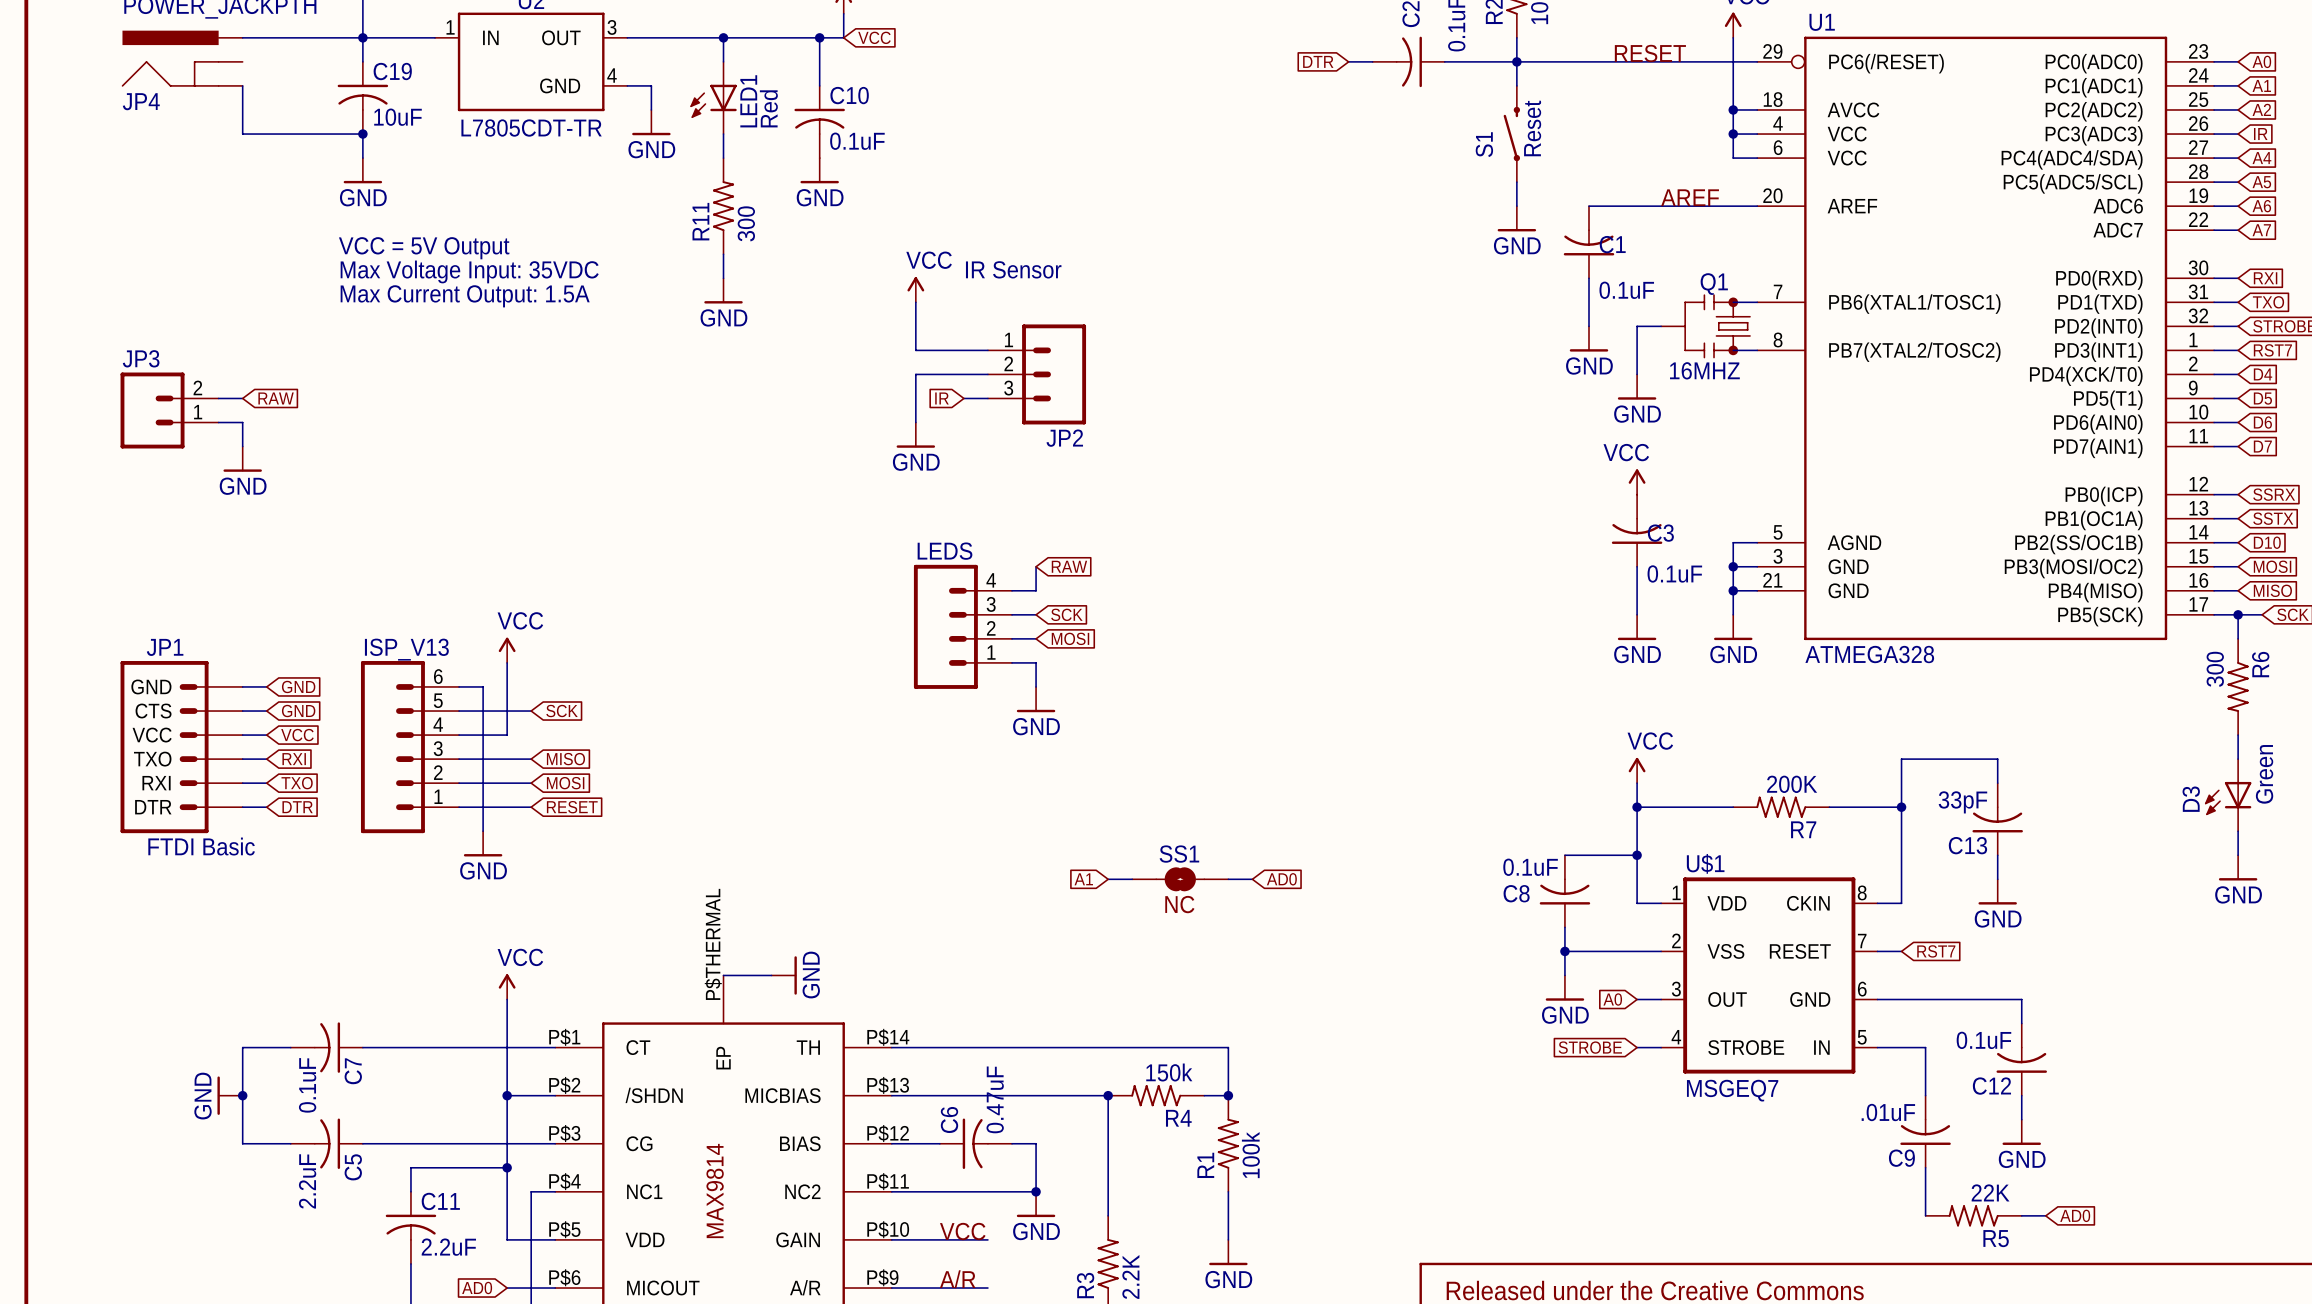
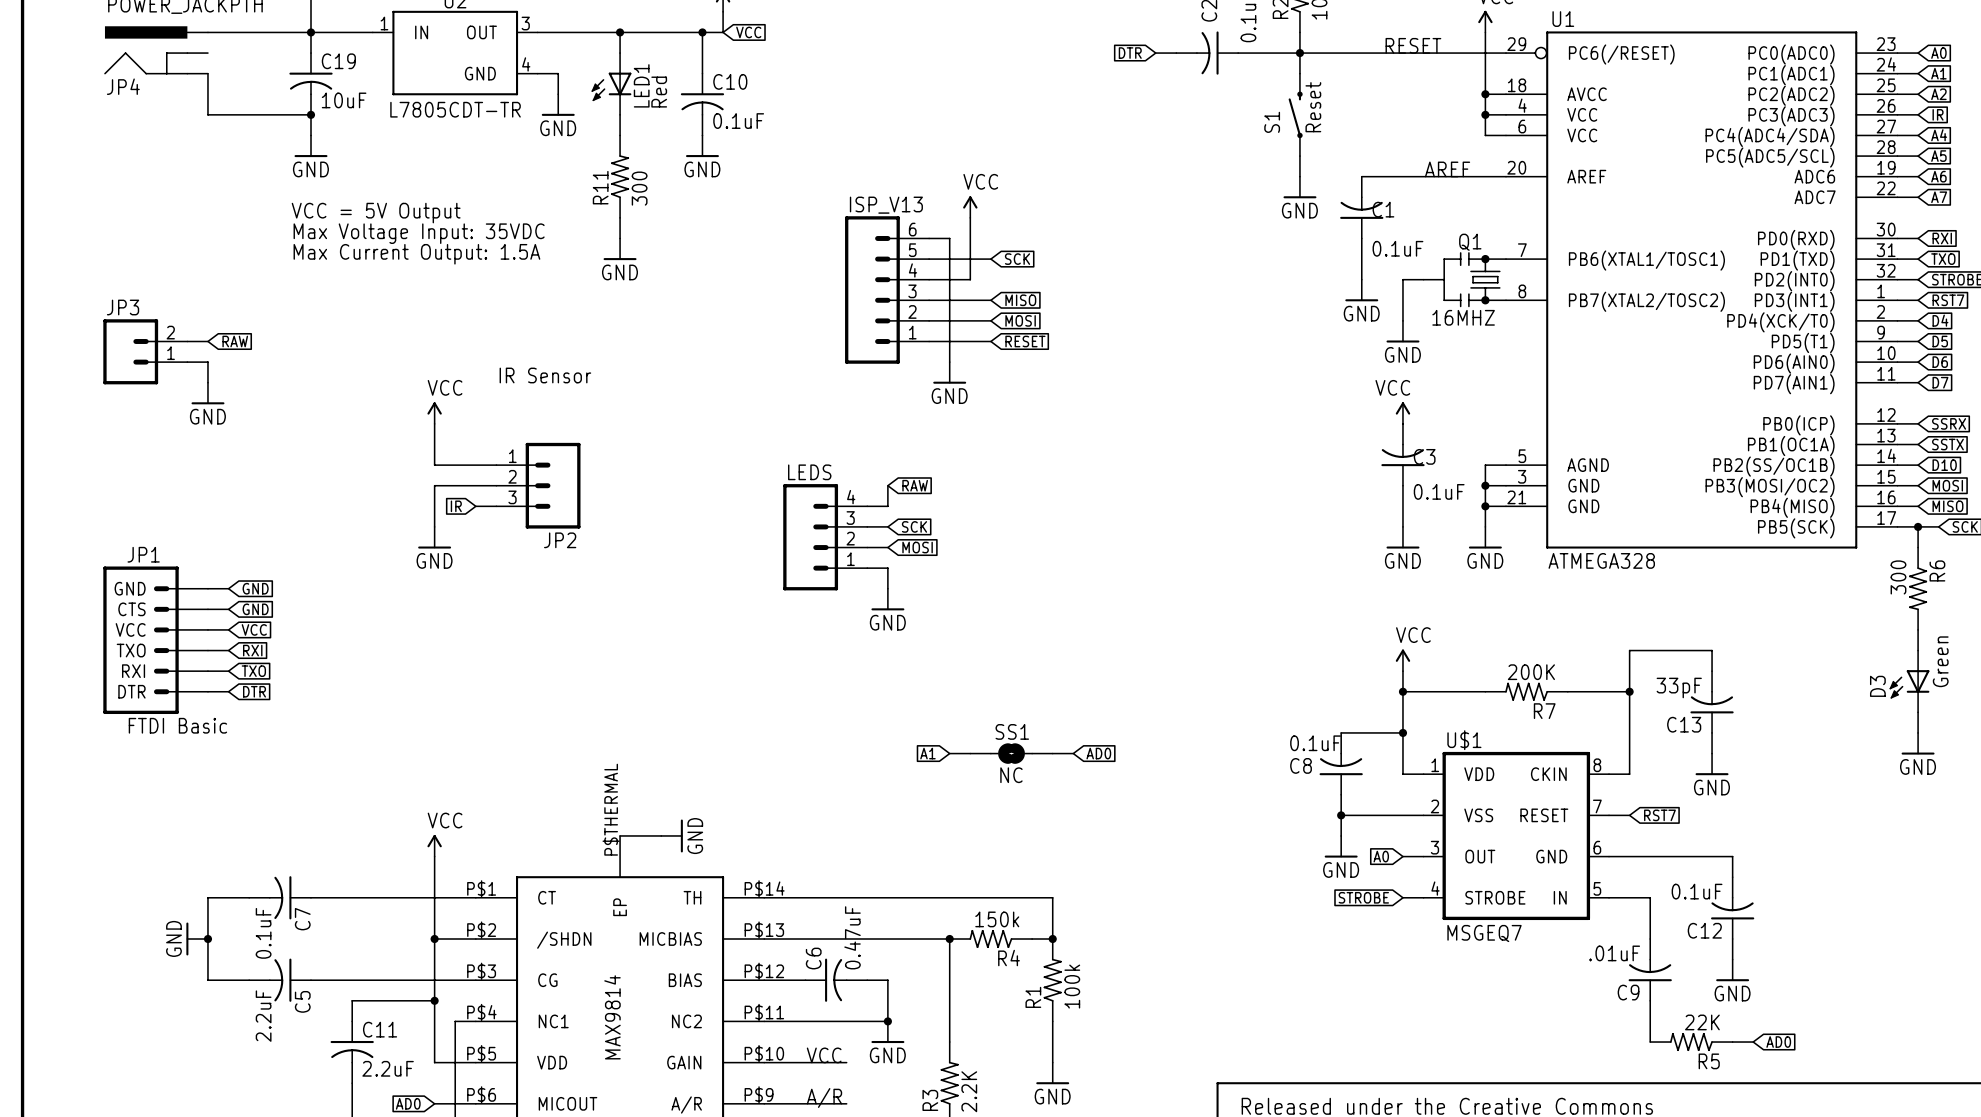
wire: none -> (970, 217) (970, 279) (929, 279)
text: IR Sensor (1013, 269) -> none
wire: none -> (929, 238) (949, 238) (949, 362)
power symbol position: VCC (915, 289) -> VCC (970, 207)
wire: (915, 302) (915, 350) (987, 350) -> none
wire: none -> (929, 259) (990, 259)
global label: none -> SCK (1017, 259)
wire: none -> (929, 300) (990, 300)
global label: none -> MISO (1020, 300)
wire: (987, 374) (915, 374) (915, 422) -> none
JP2 position: (1037, 374) -> (538, 485)
wire: none -> (929, 320) (990, 320)
global label: none -> MOSI (1020, 320)
global label: IR (941, 398) -> none
wire: (963, 398) (987, 398) -> none
wire: none -> (929, 341) (990, 341)
global label: none -> RESET (1025, 341)
power symbol position: GND (915, 435) -> GND (949, 372)
text: none -> IR Sensor (545, 375)
wire: none -> (434, 423) (434, 465) (496, 465)
wire: none -> (496, 485) (434, 485) (434, 526)
global label: none -> IR (456, 506)
wire: none -> (475, 506) (496, 506)
power symbol position: VCC (507, 650) -> VCC (434, 413)
wire: (507, 662) (507, 735) (459, 735) -> none
wire: (459, 686) (483, 686) (483, 831) -> none
wire: (459, 711) (531, 711) -> none
global label: SCK (562, 711) -> none
ISP_V13 position: (410, 747) -> (887, 289)
wire: (459, 759) (531, 759) -> none
global label: MISO (565, 759) -> none
wire: (459, 783) (531, 783) -> none
global label: MOSI (565, 783) -> none
wire: (459, 807) (531, 807) -> none
global label: RESET (572, 807) -> none
power symbol position: GND (483, 843) -> GND (434, 537)

